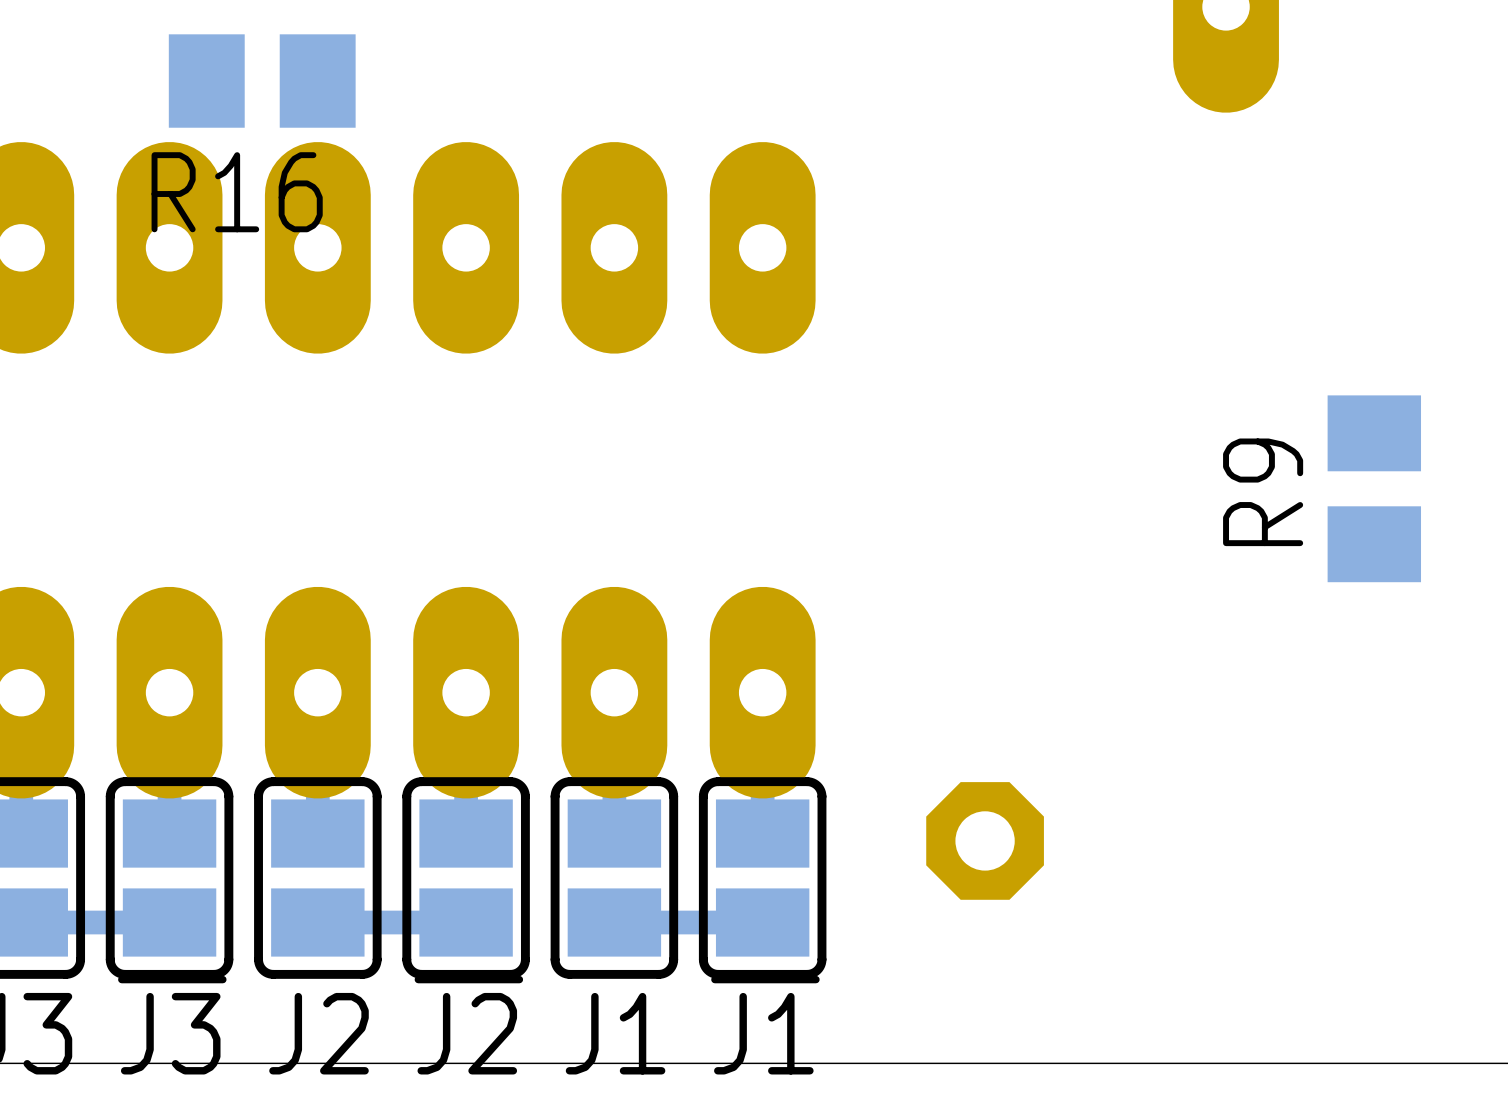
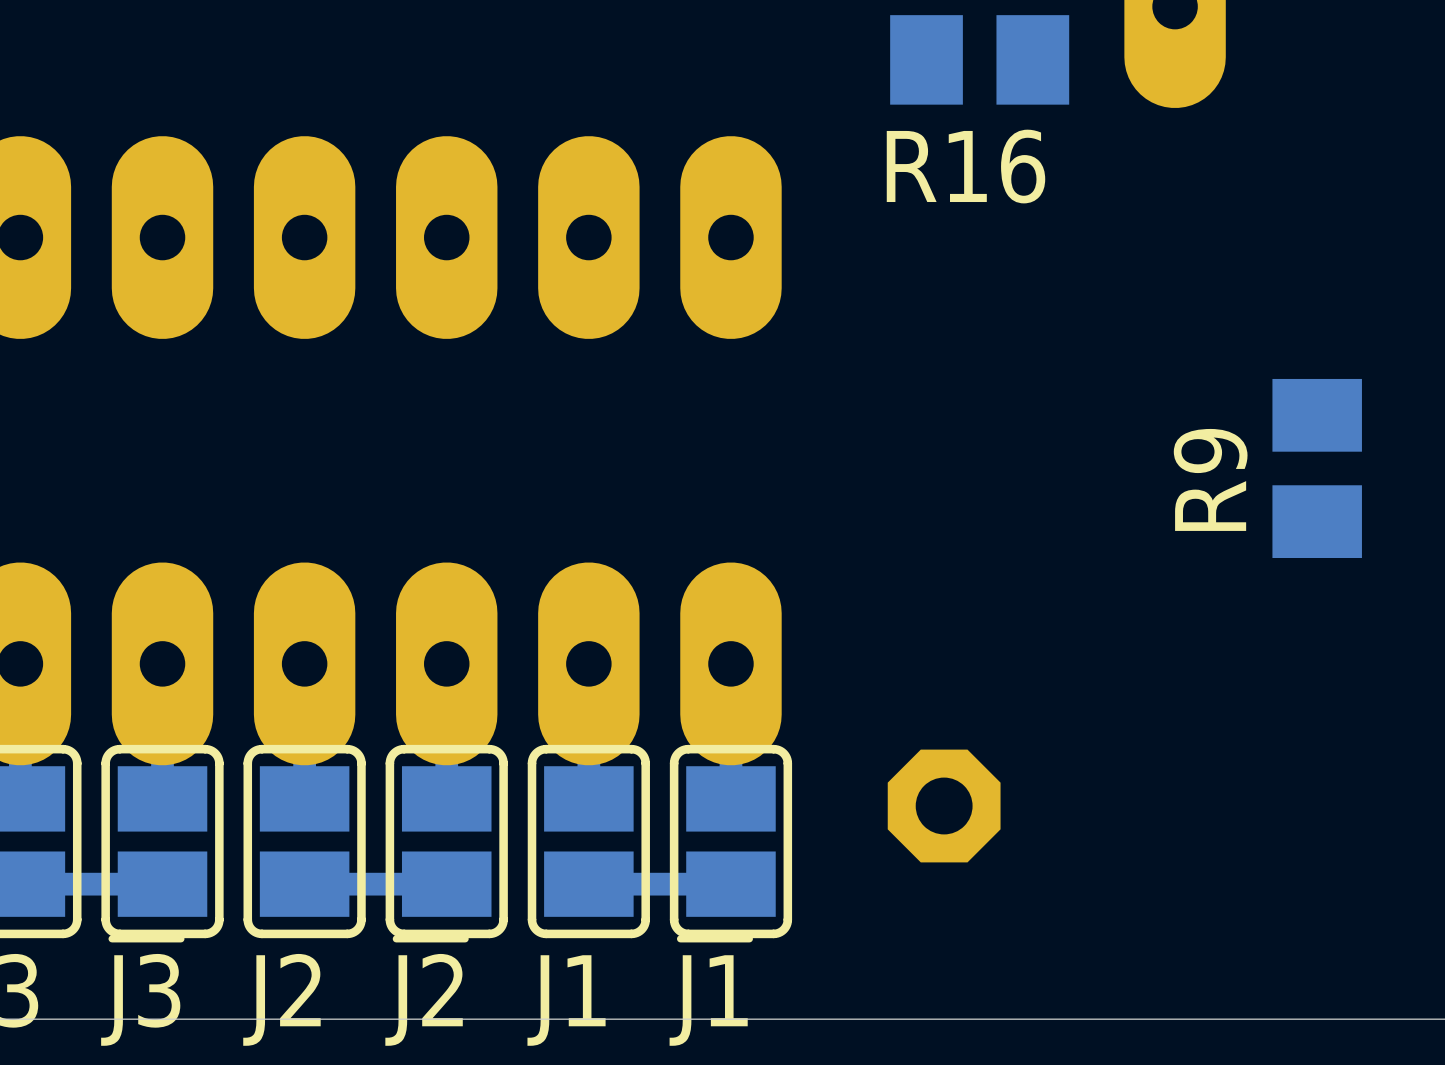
R16 position: (262, 81) -> (979, 59)

